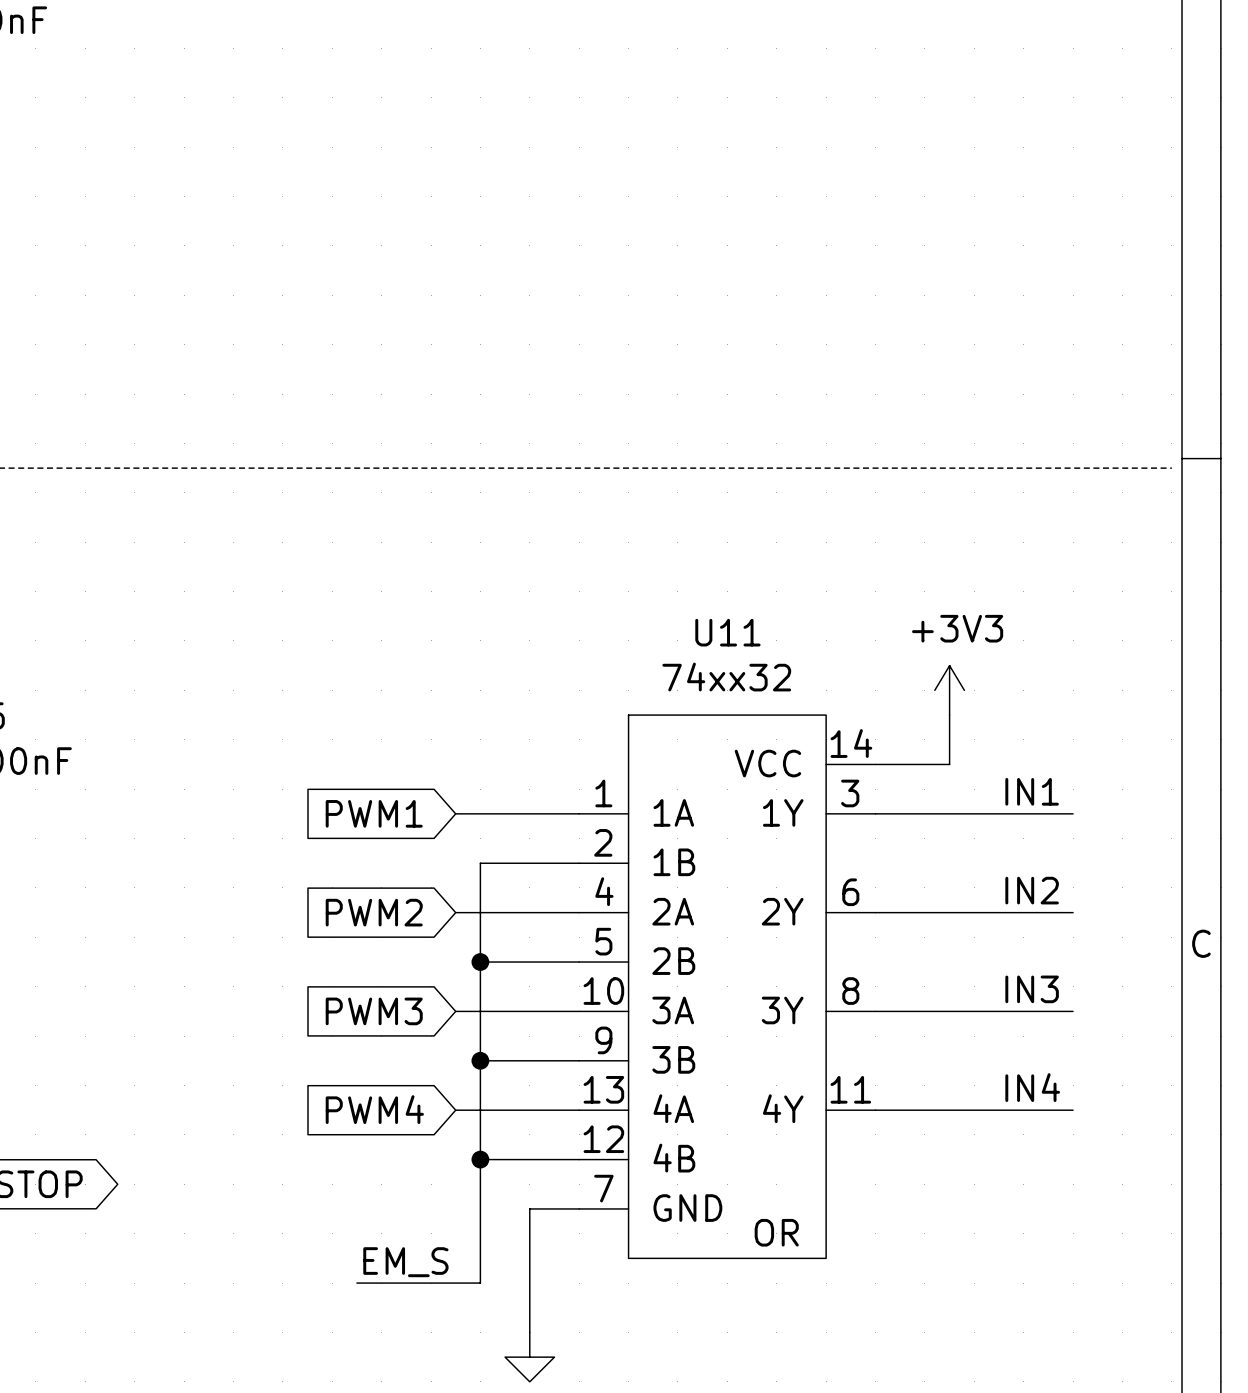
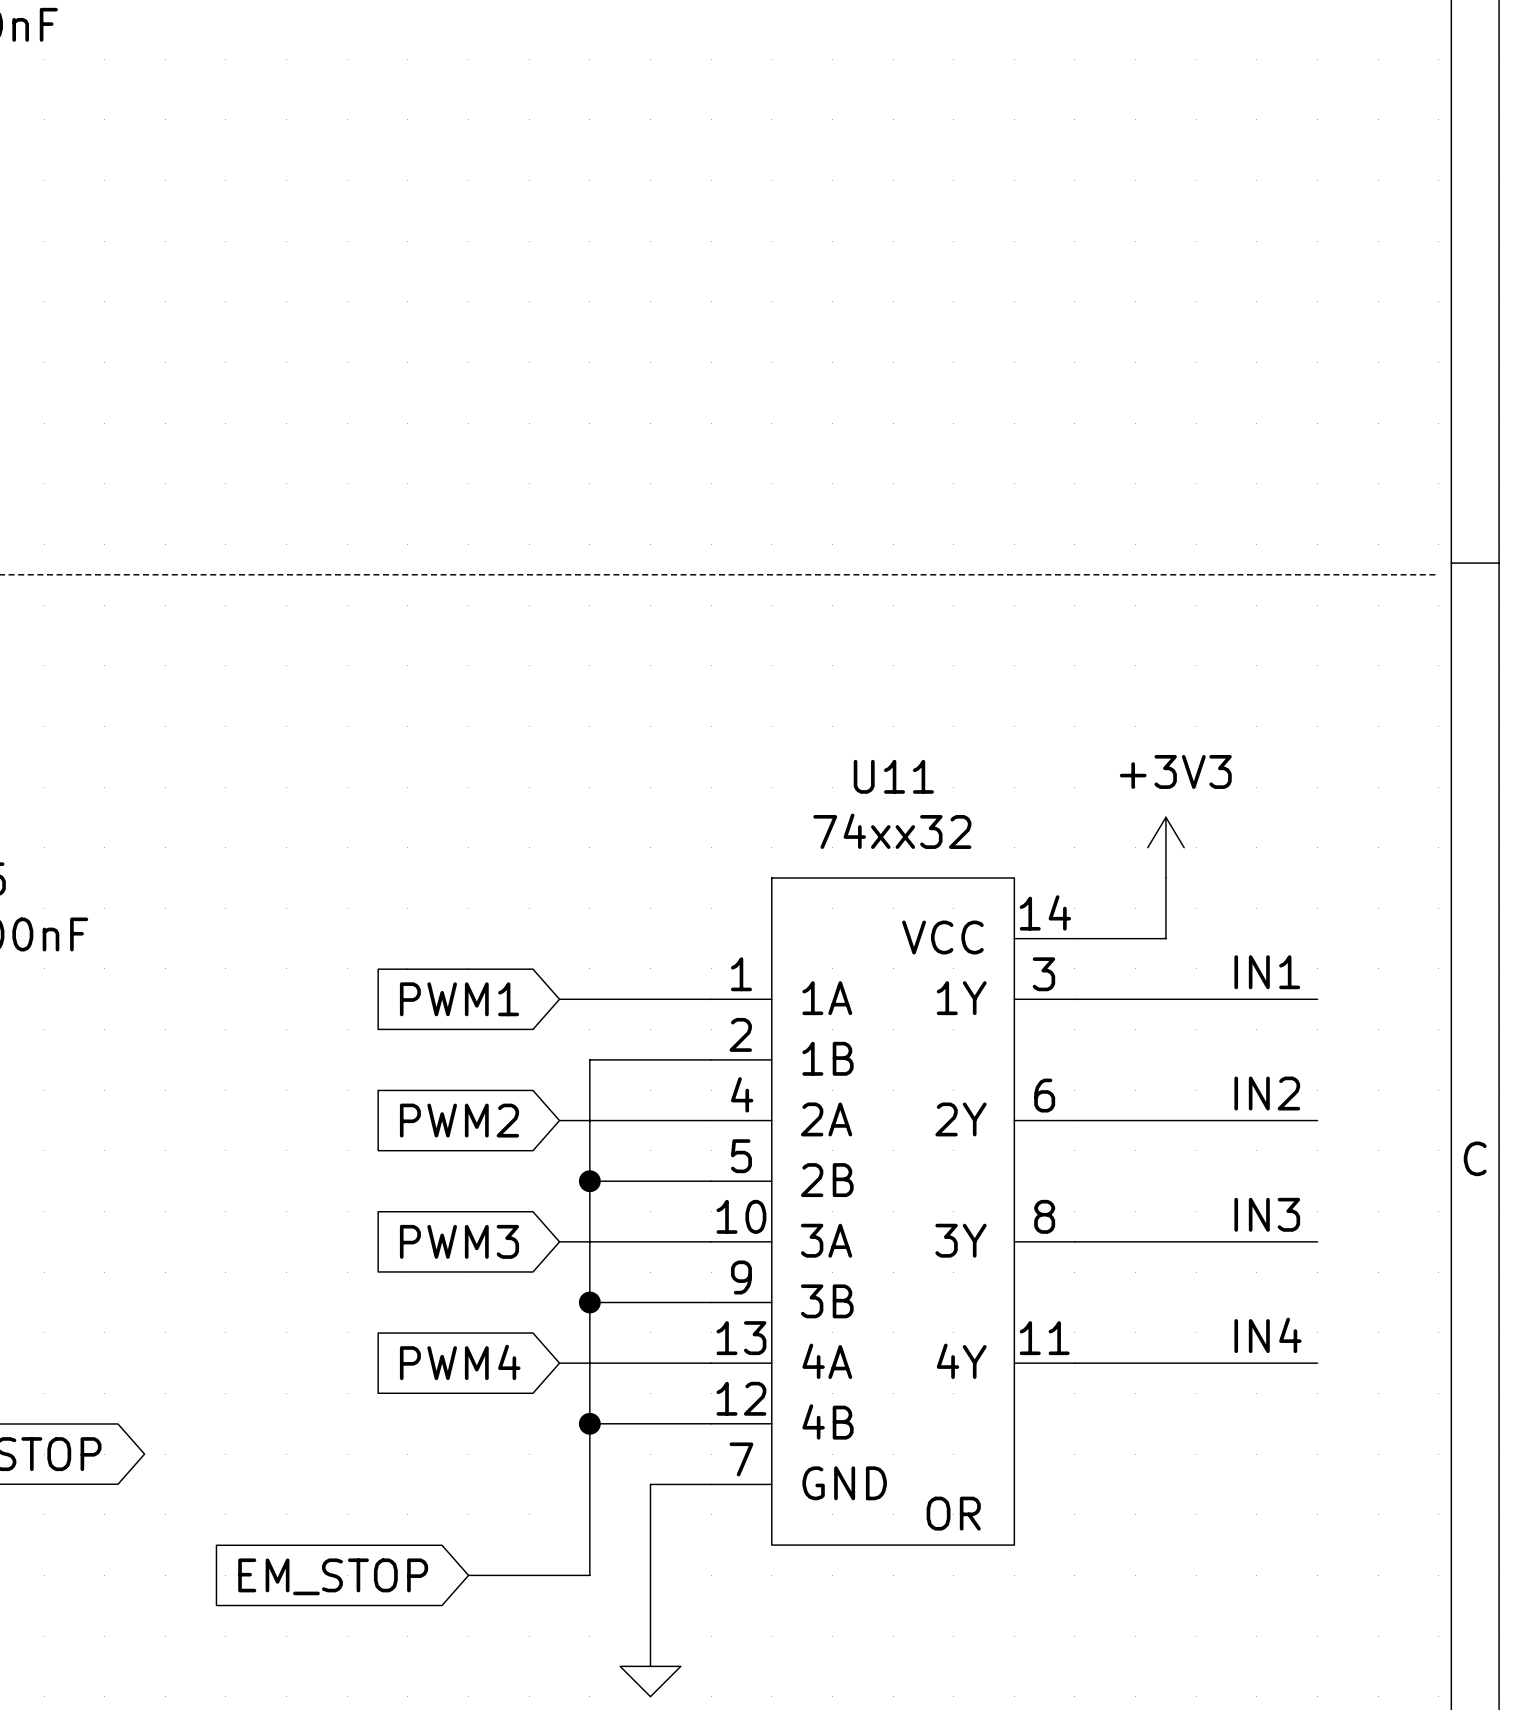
label: EM_S (405, 1262) -> none
wire: (356, 1283) (381, 1283) -> none
global label: none -> EM_STOP (333, 1576)

